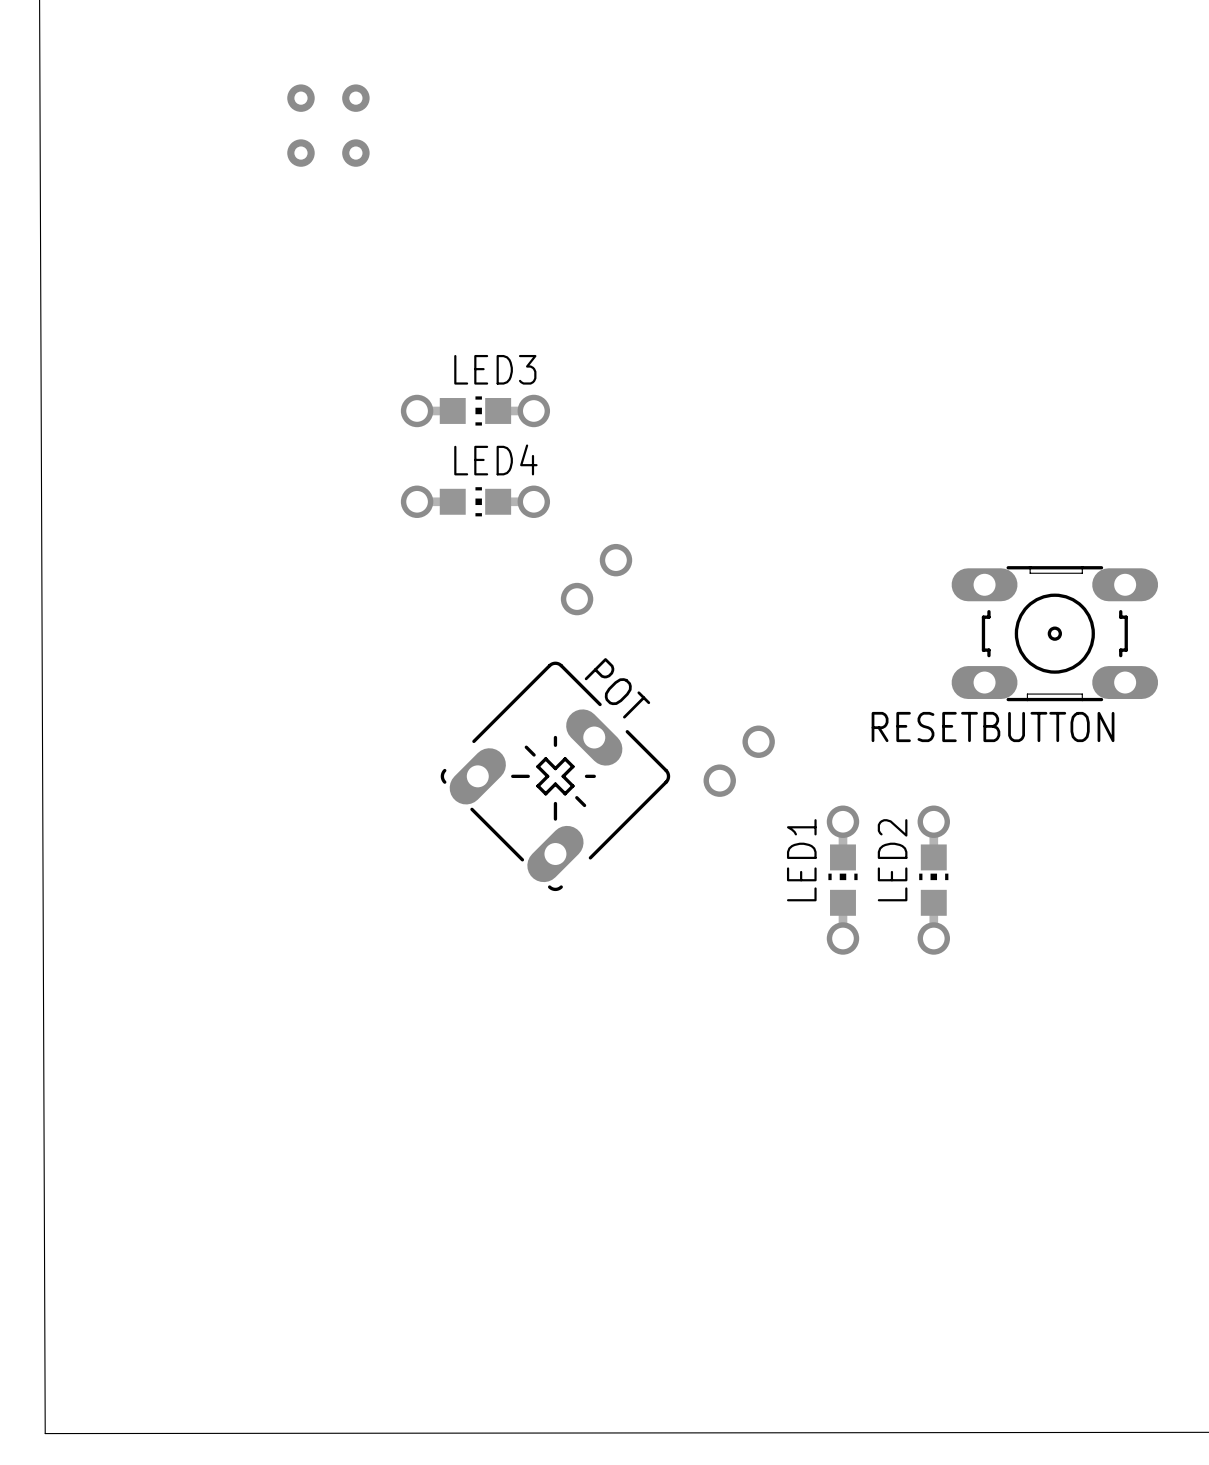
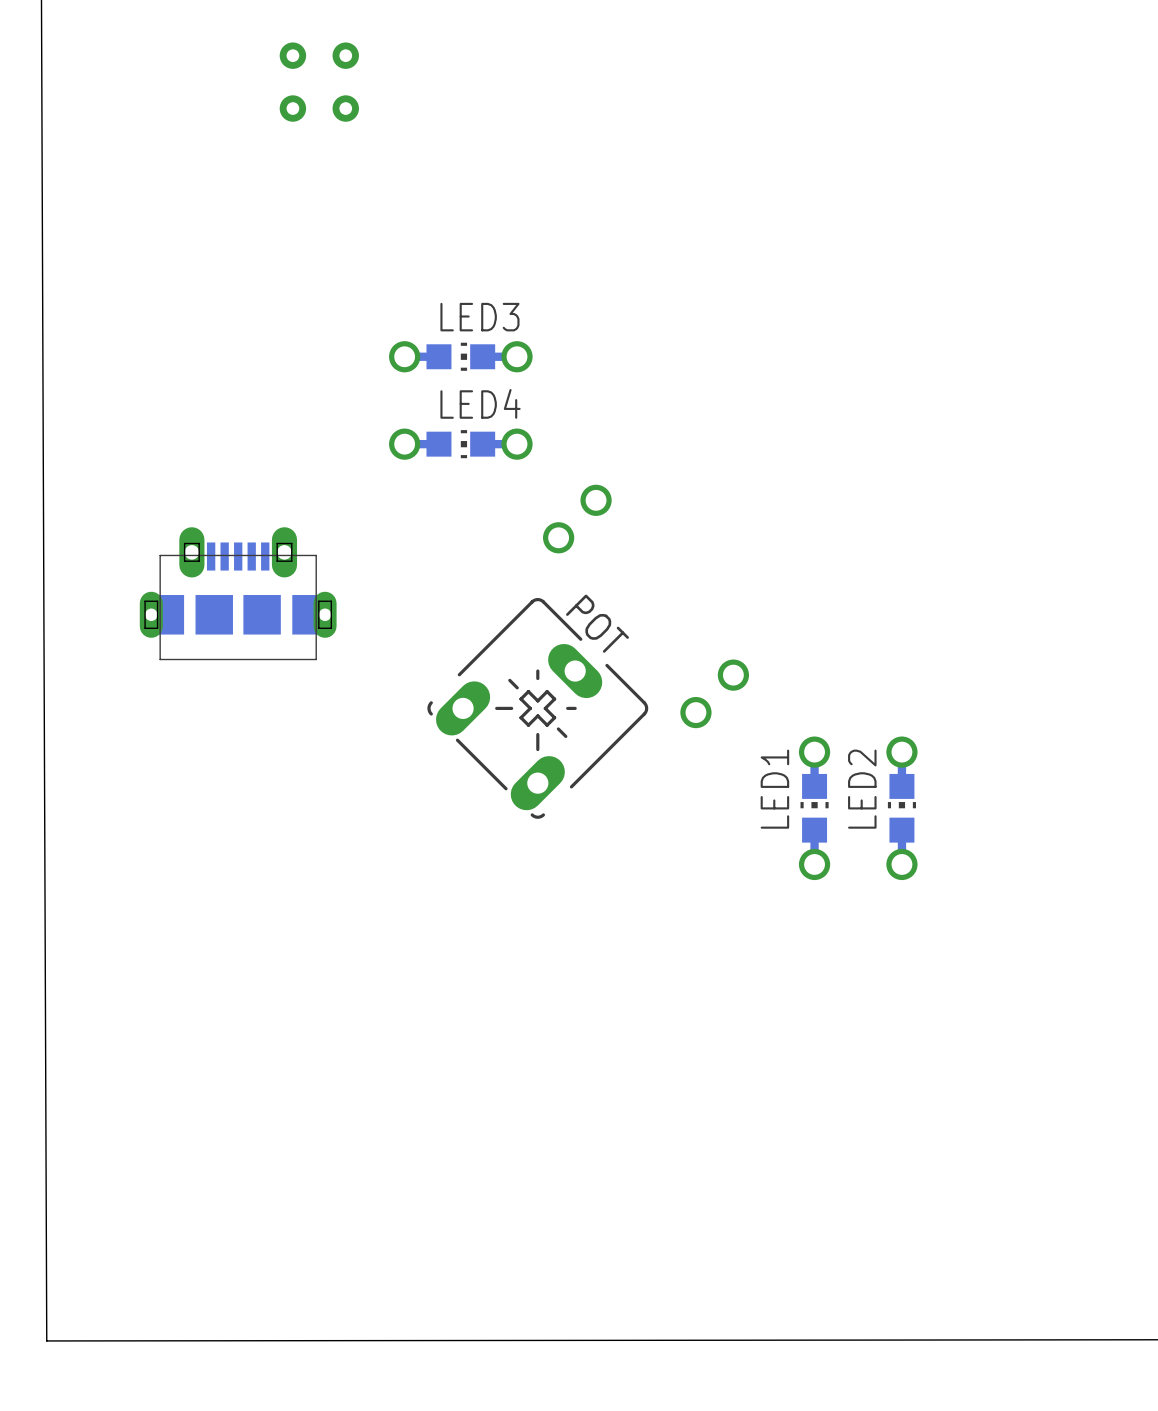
RESETBUTTON: (1054, 633) -> none
part: none -> (238, 593)

